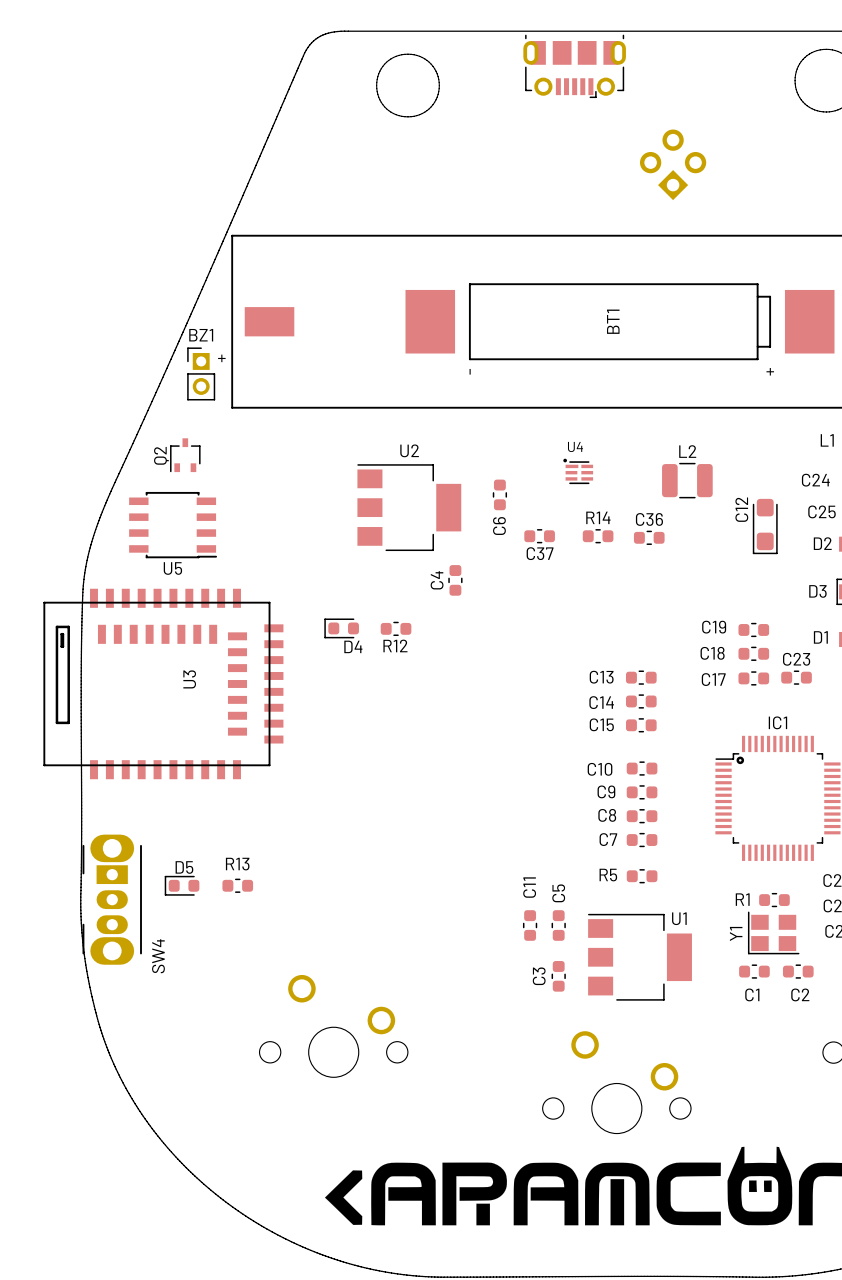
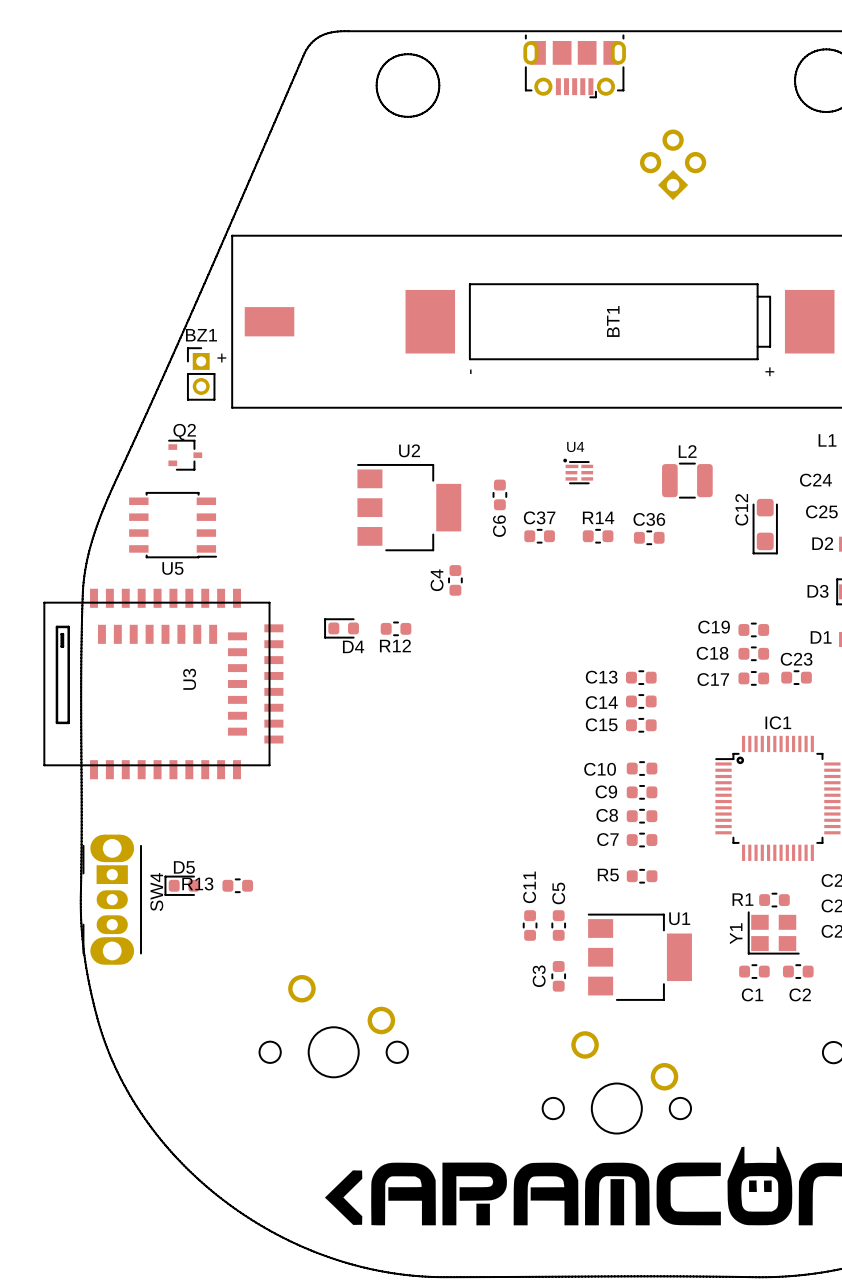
Q2 rotation: 0° (185, 455) -> 90° clockwise (185, 455)
C37 name position: C37 (540, 553) -> C37 (539, 517)
R13 name position: R13 (237, 864) -> R13 (197, 883)
SW4 name position: SW4 (158, 956) -> SW4 (156, 892)

